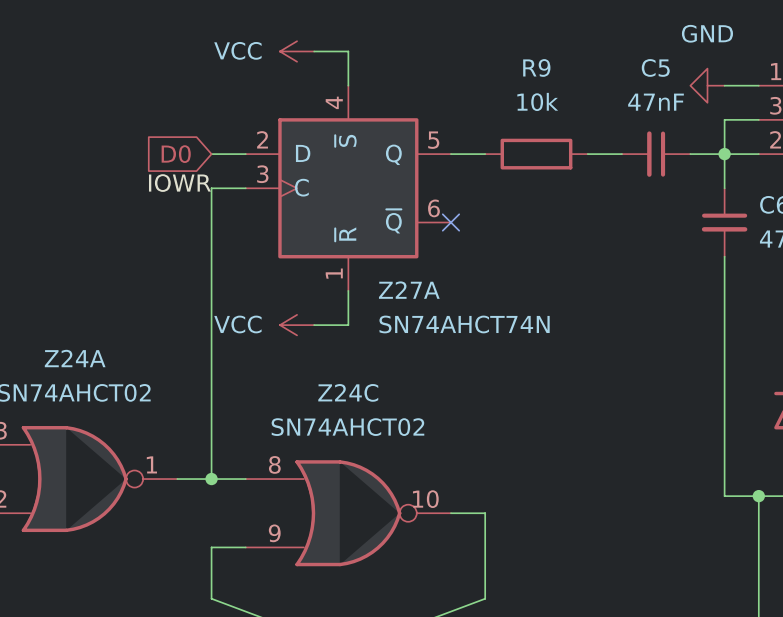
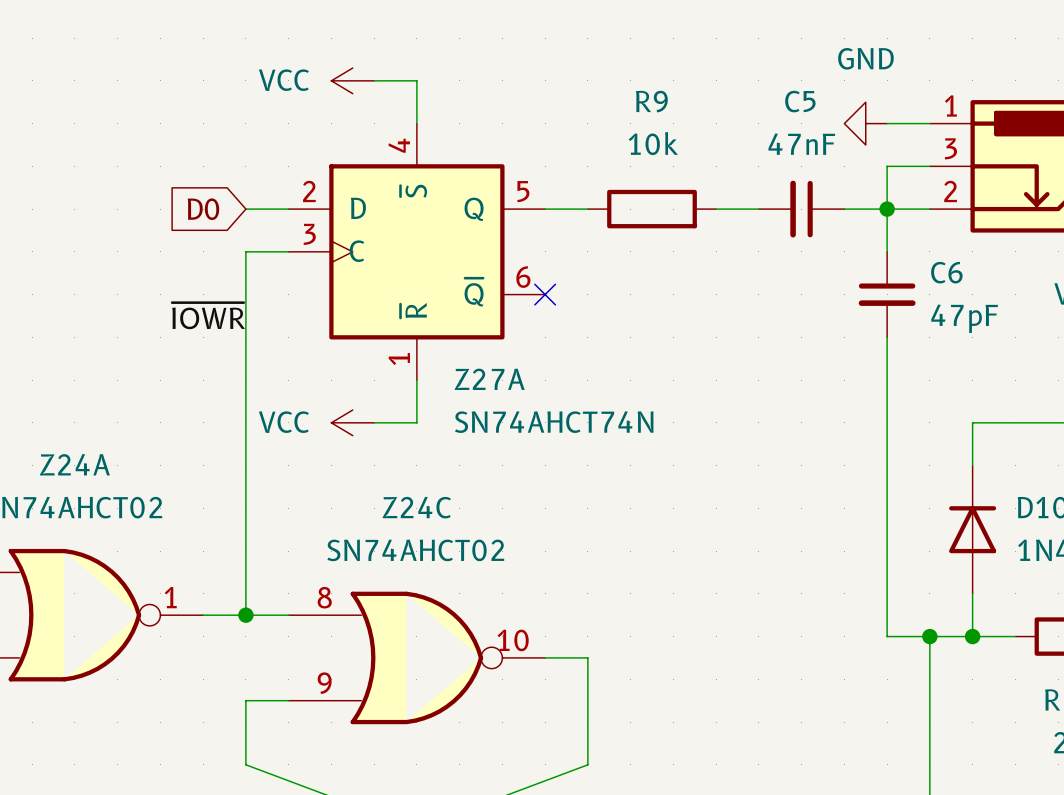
label: IOWR (179, 183) -> none
label: none -> ~{IOWR} (208, 315)

